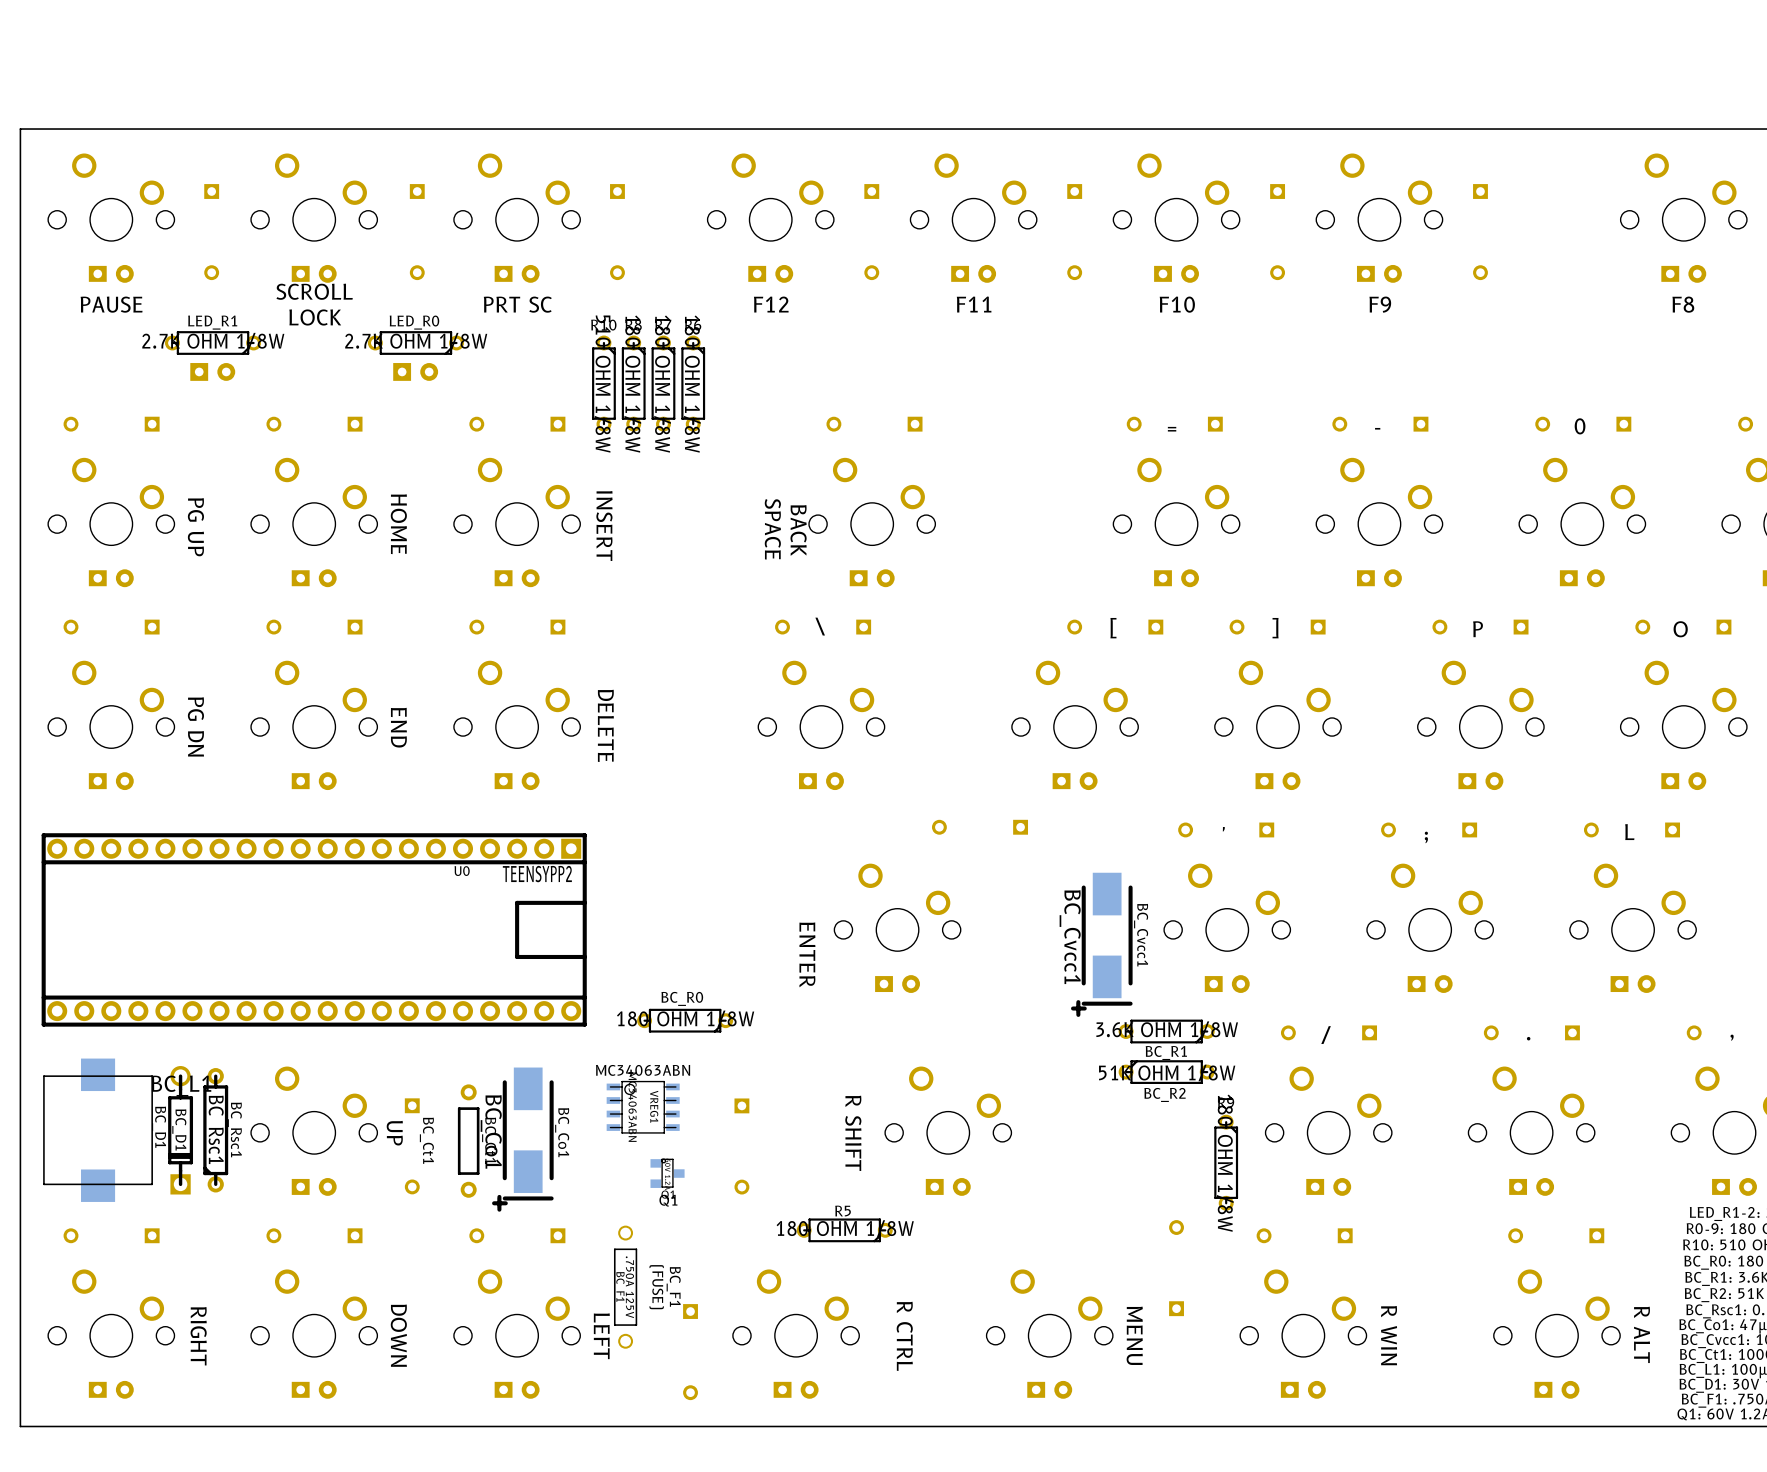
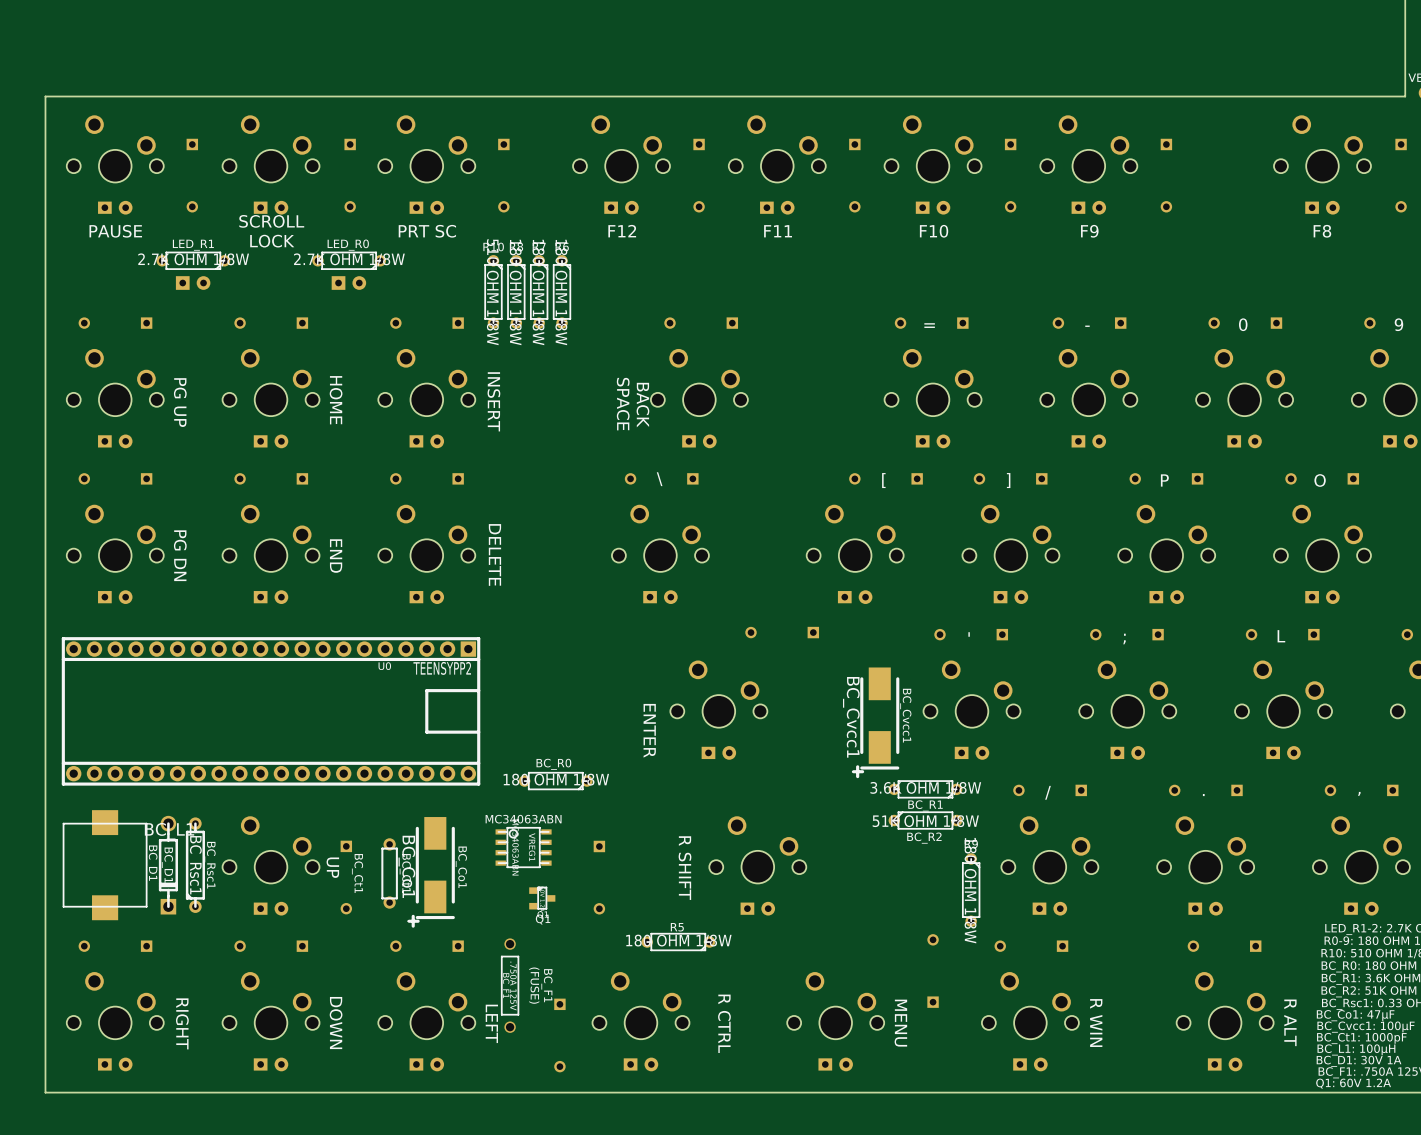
BC_Ct1 footprint: [457, 1084, 480, 1198] -> [381, 838, 398, 909]

